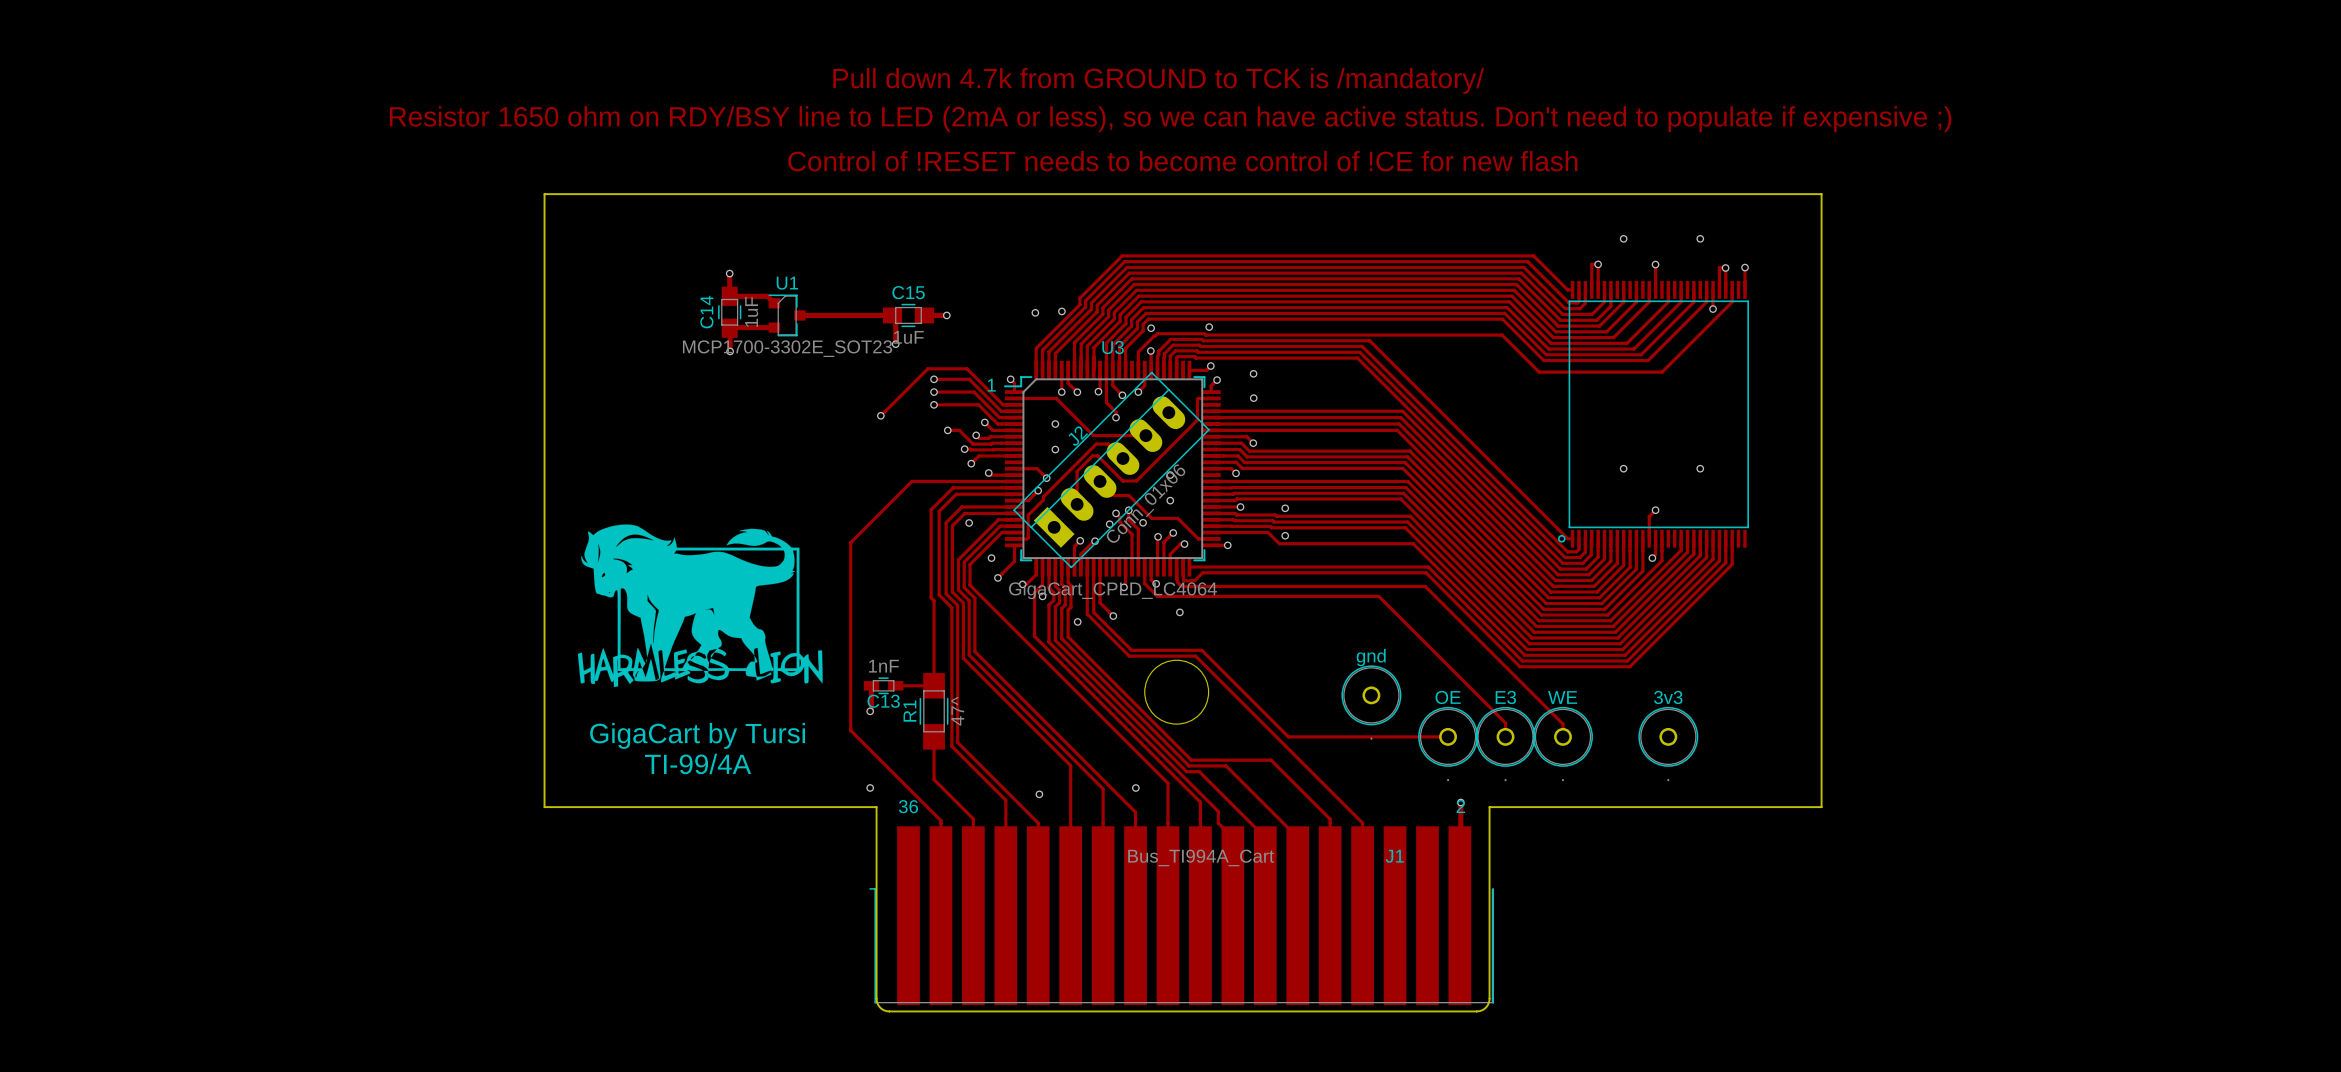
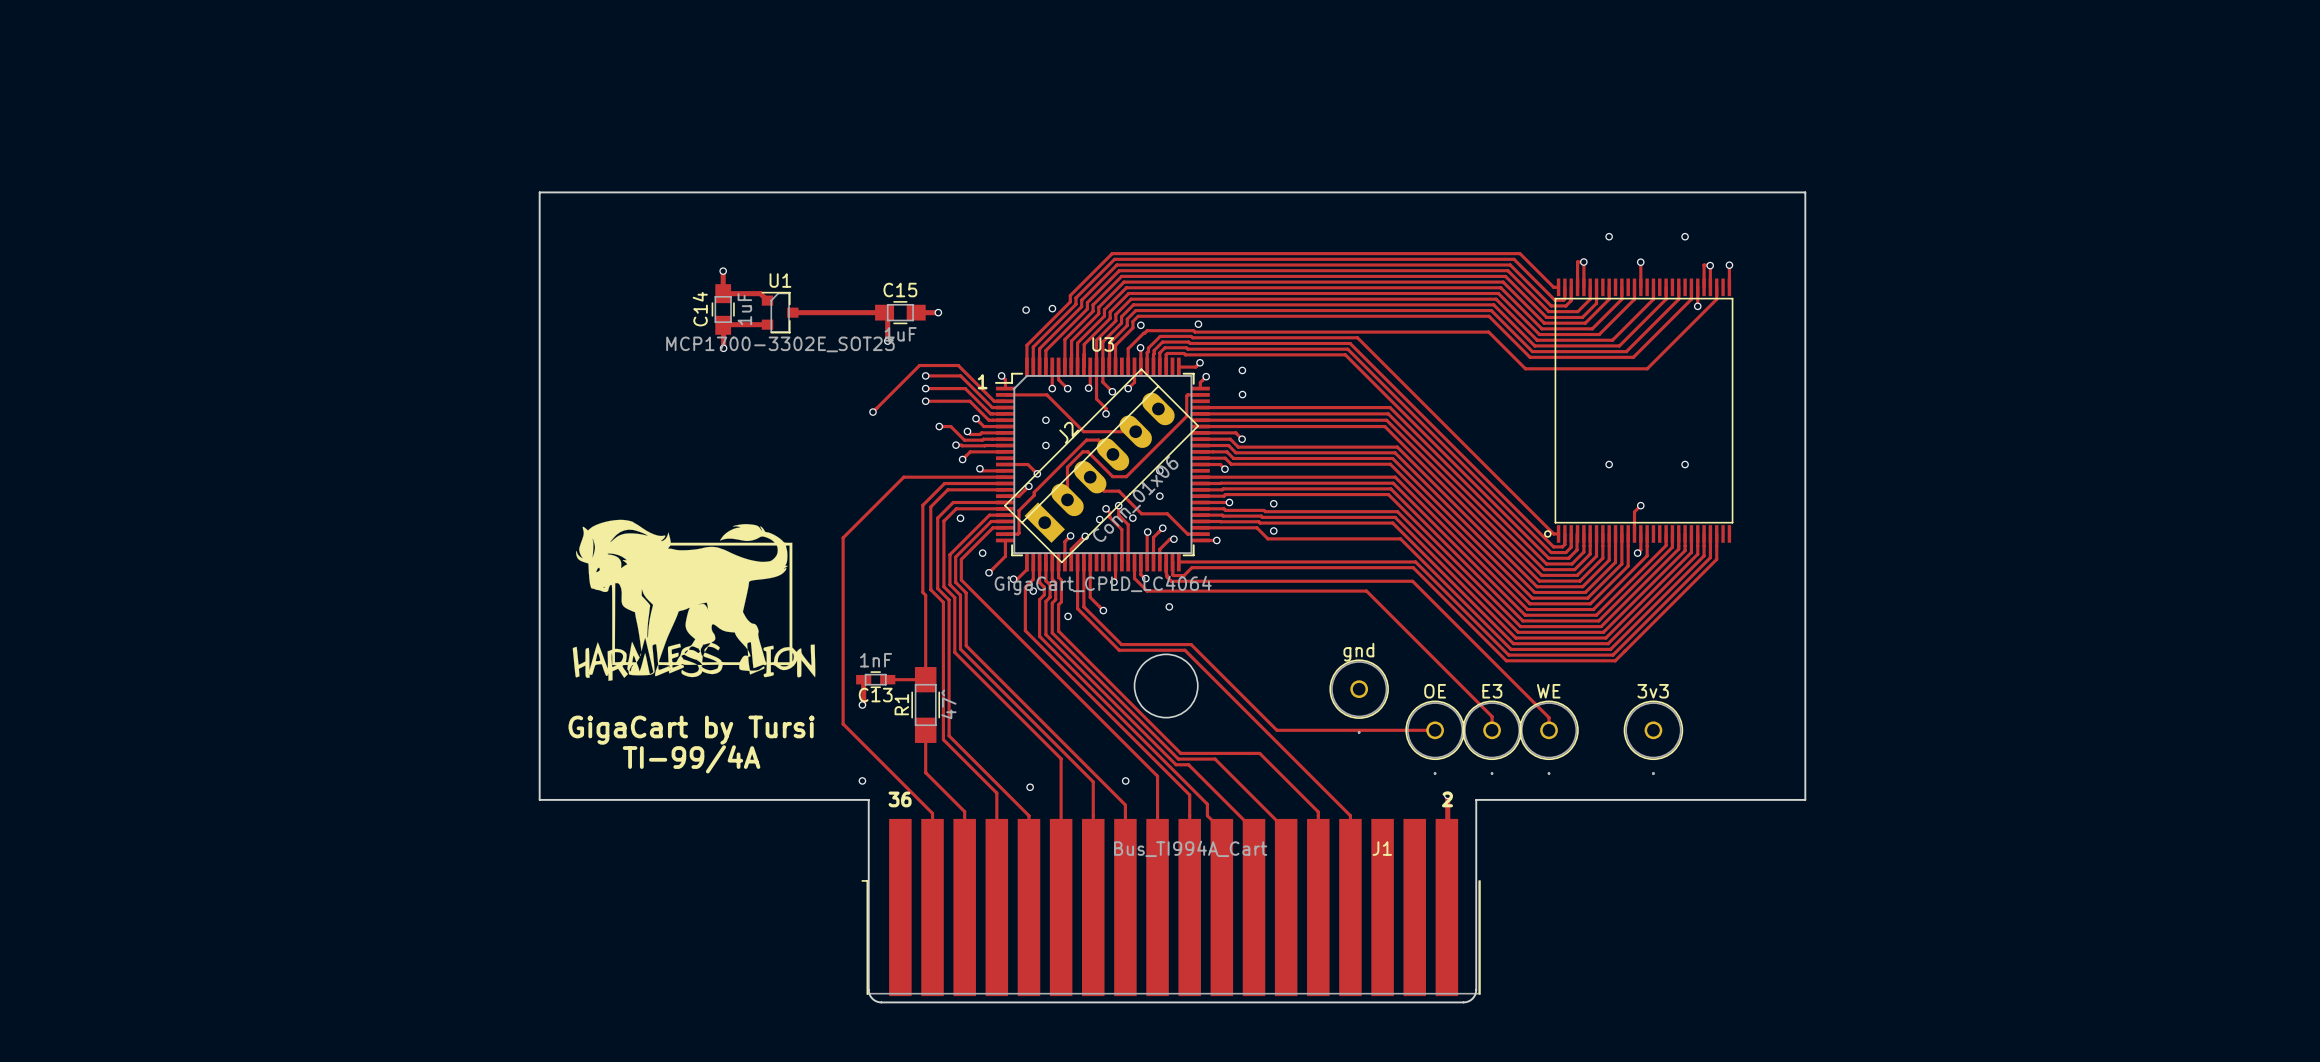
text: Pull down 4.7k from GROUND to TCK is /mandatory/ (1158, 80) -> none
text: Resistor 1650 ohm on RDY/BSY line to LED (2mA or less), so we can have active status. Don't need to populate if expensive ;) (1170, 119) -> none
text: Control of !RESET needs to become control of !CE for new flash (1182, 161) -> none

